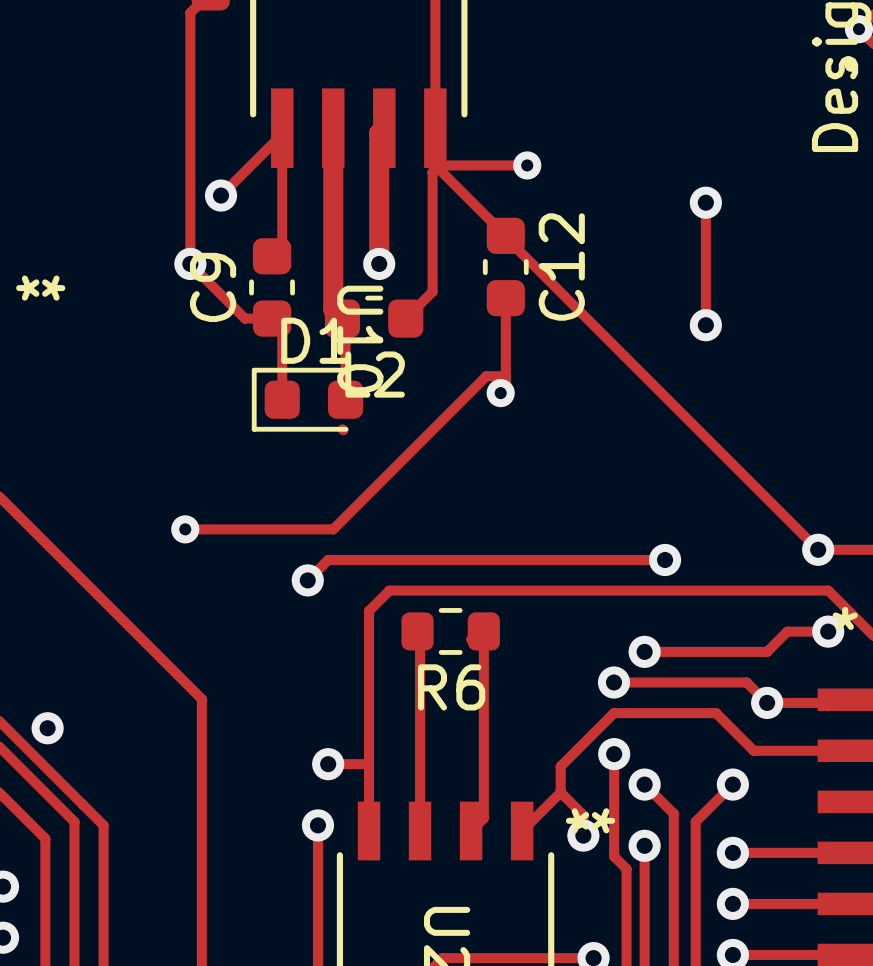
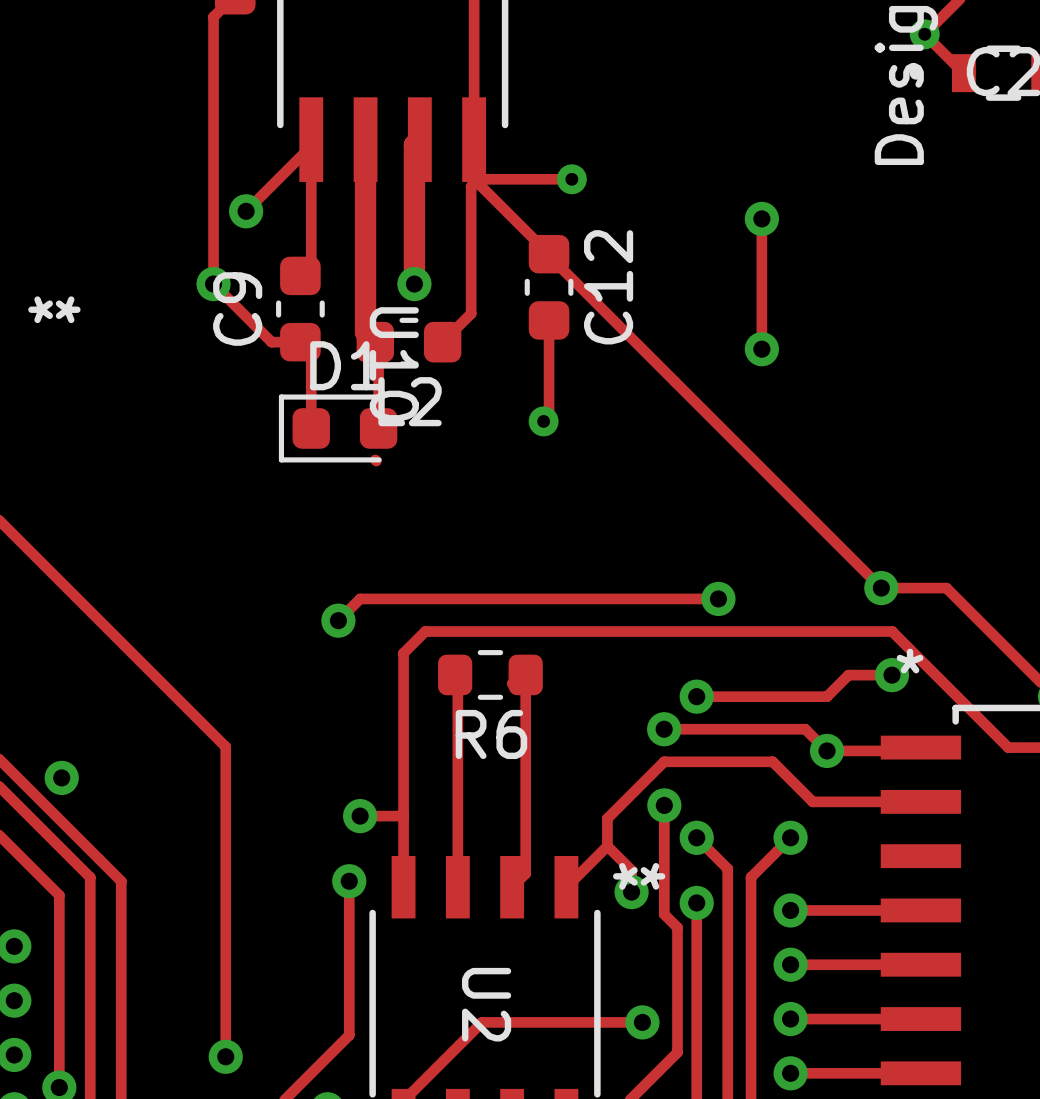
track: (505, 376) (486, 376) (333, 529) (185, 529) -> none
via: (185, 529) -> none

